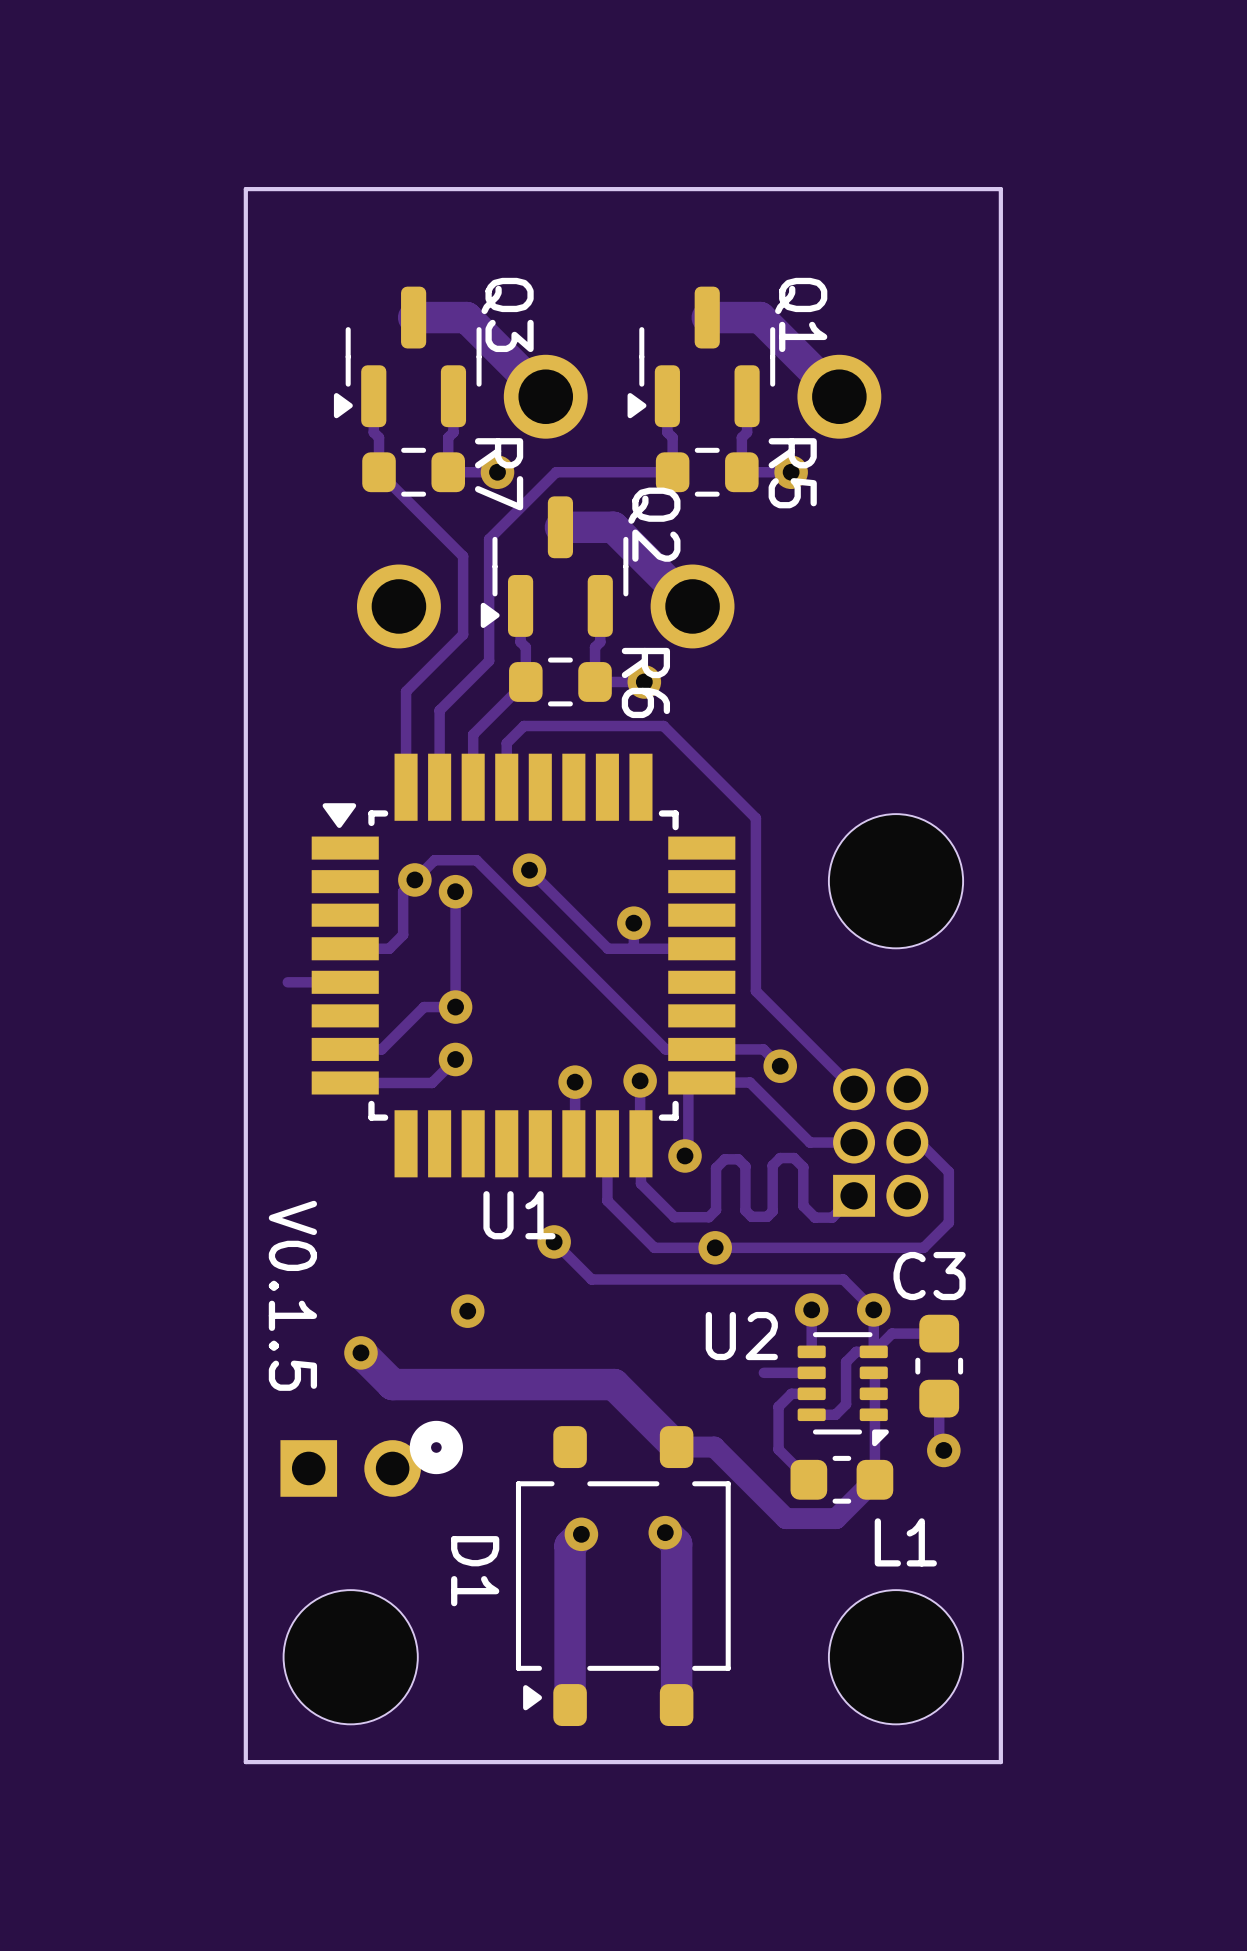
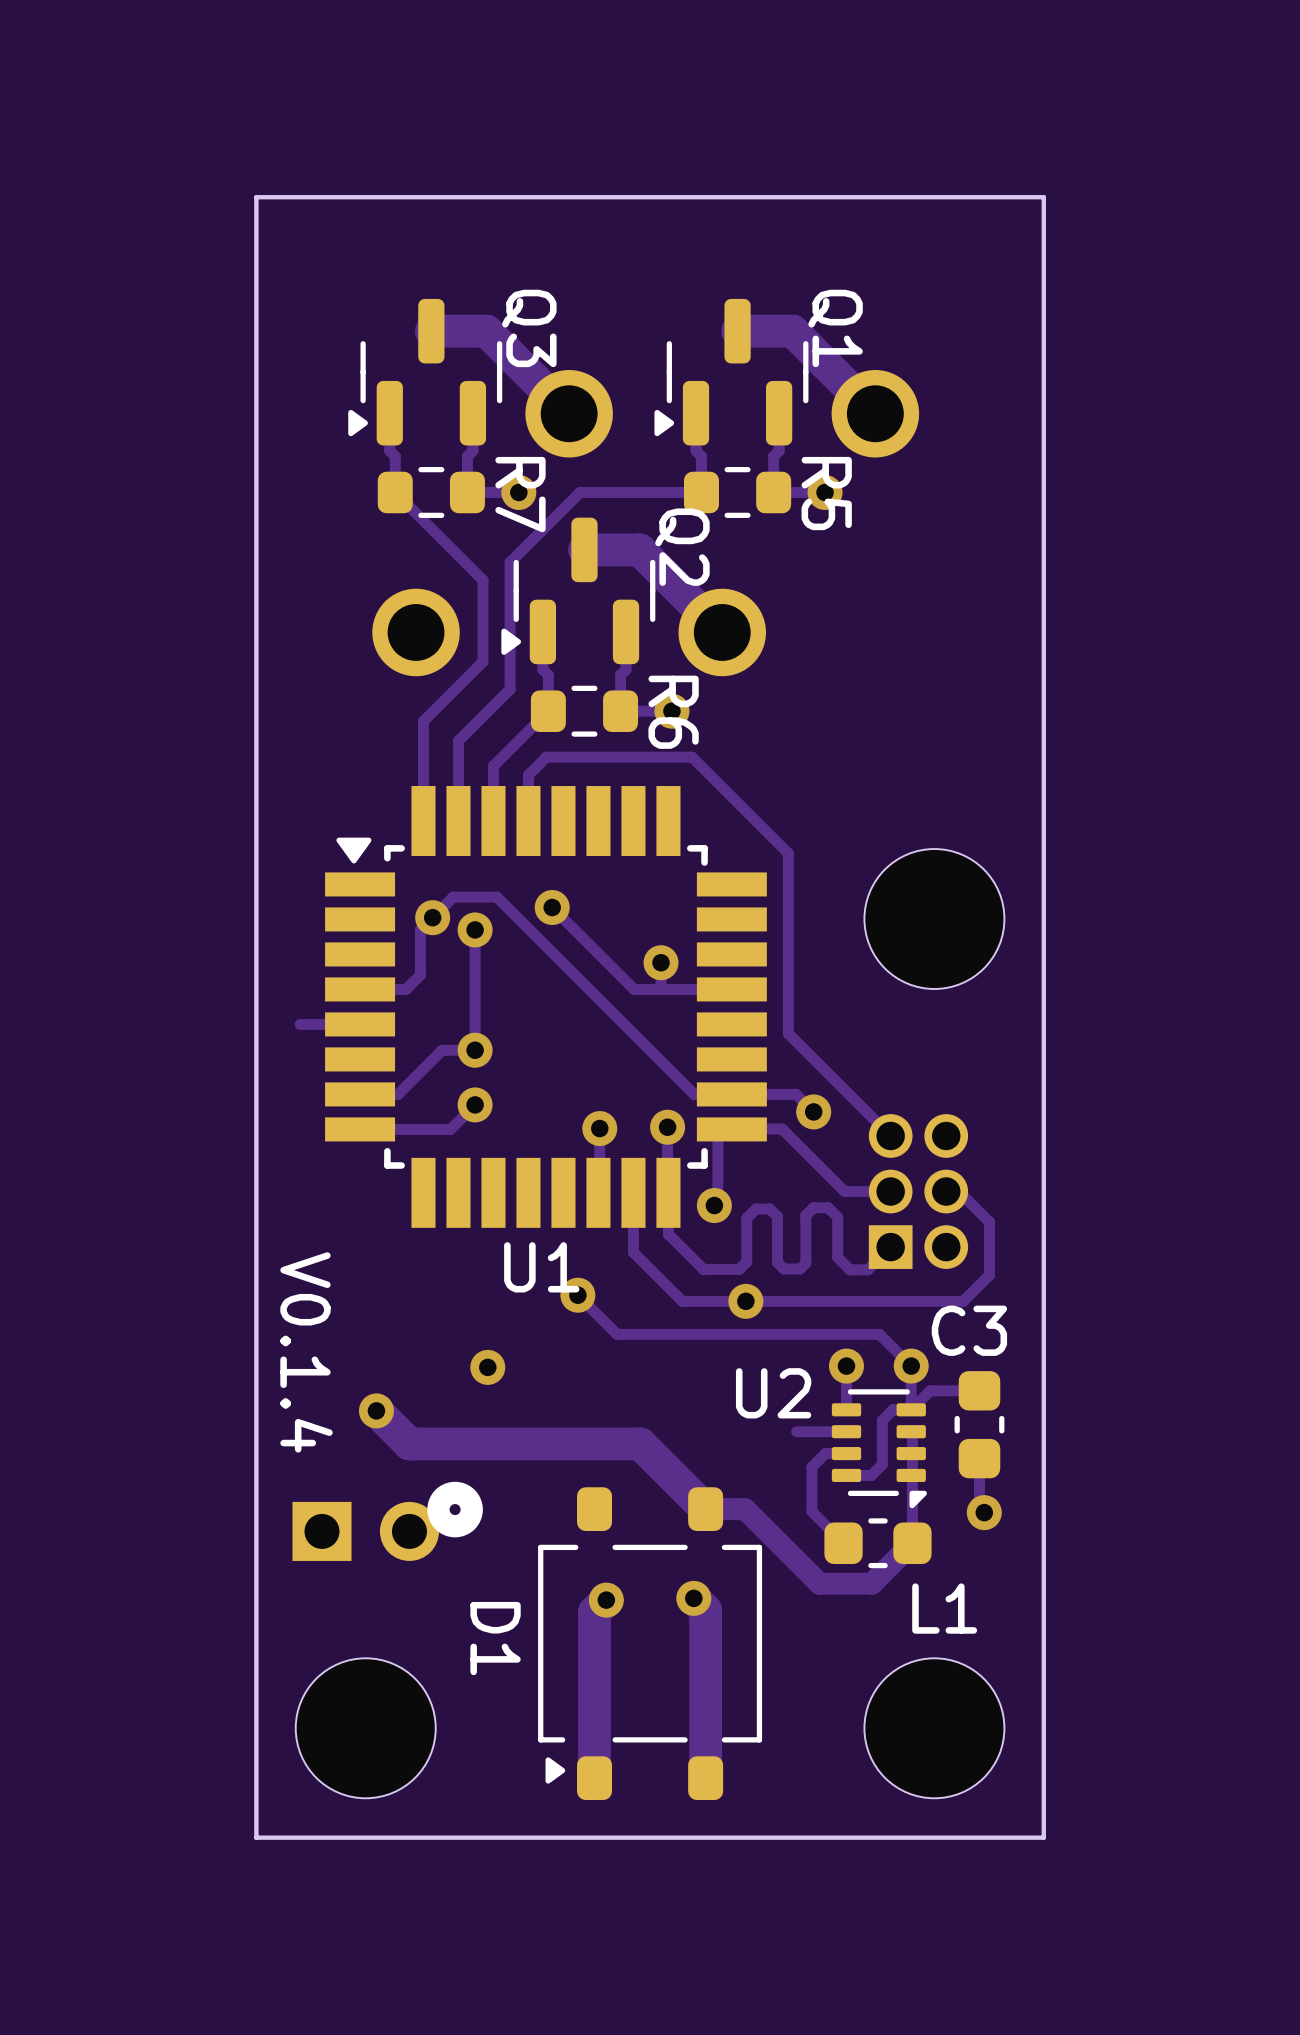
text: V0.1.5 (292, 1295) -> V0.1.4 (306, 1352)

